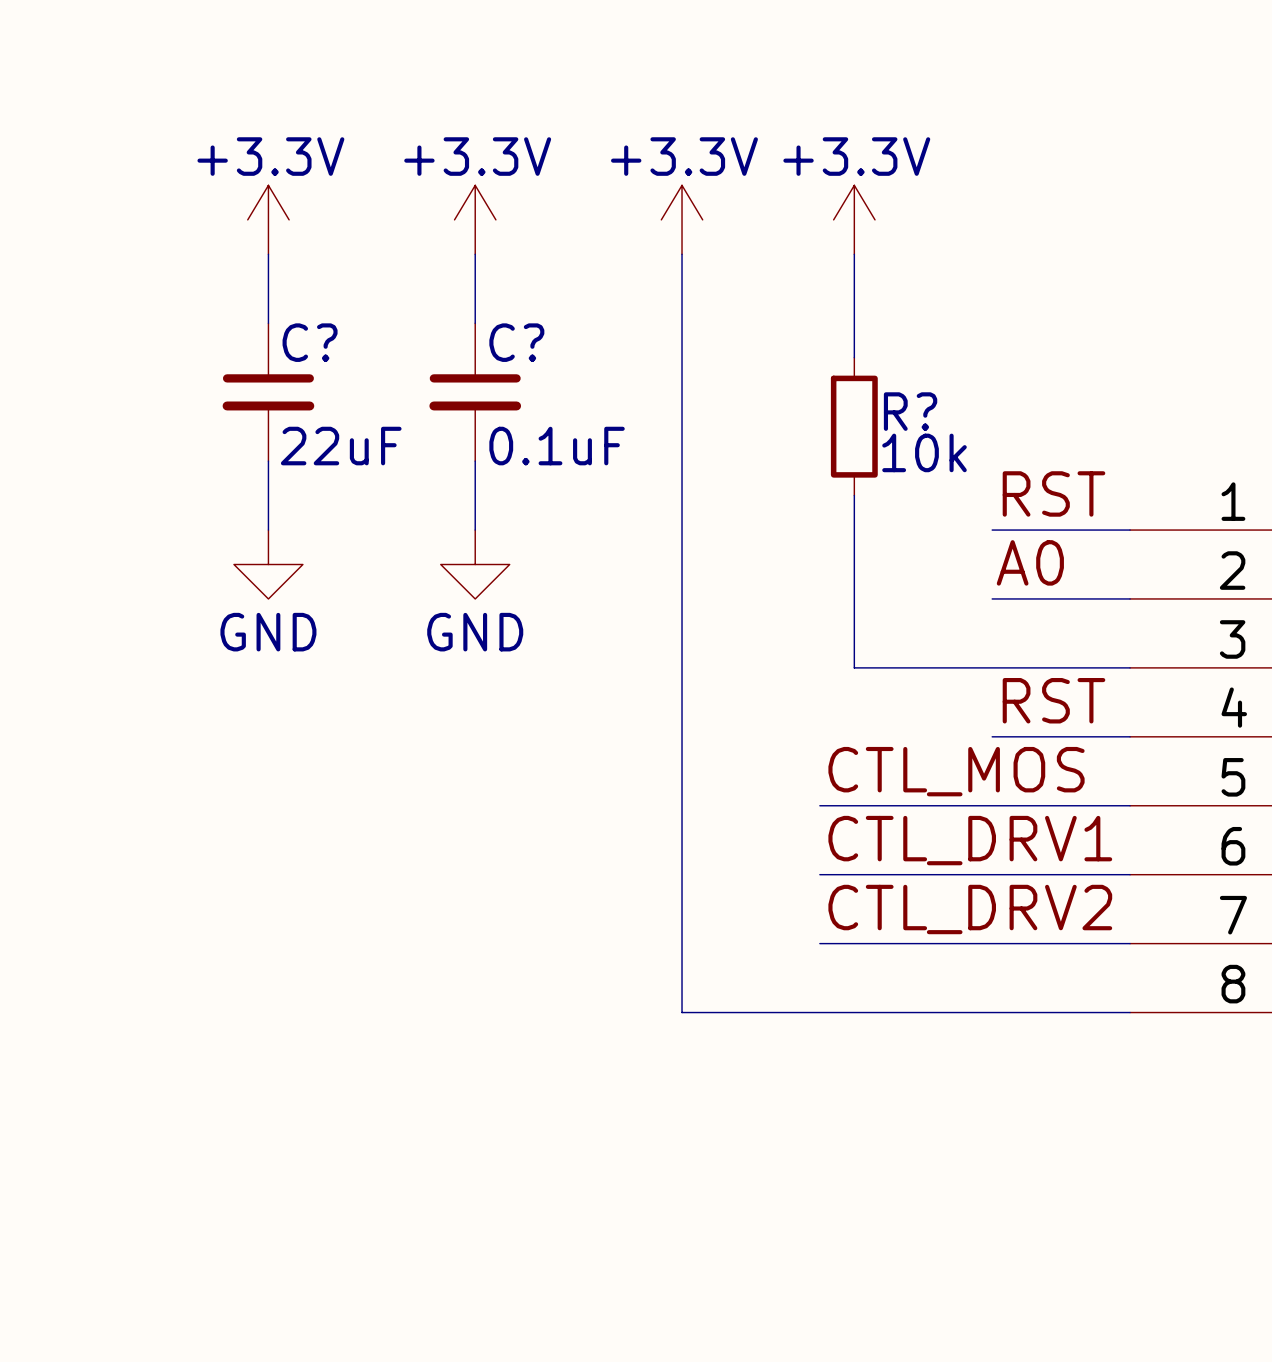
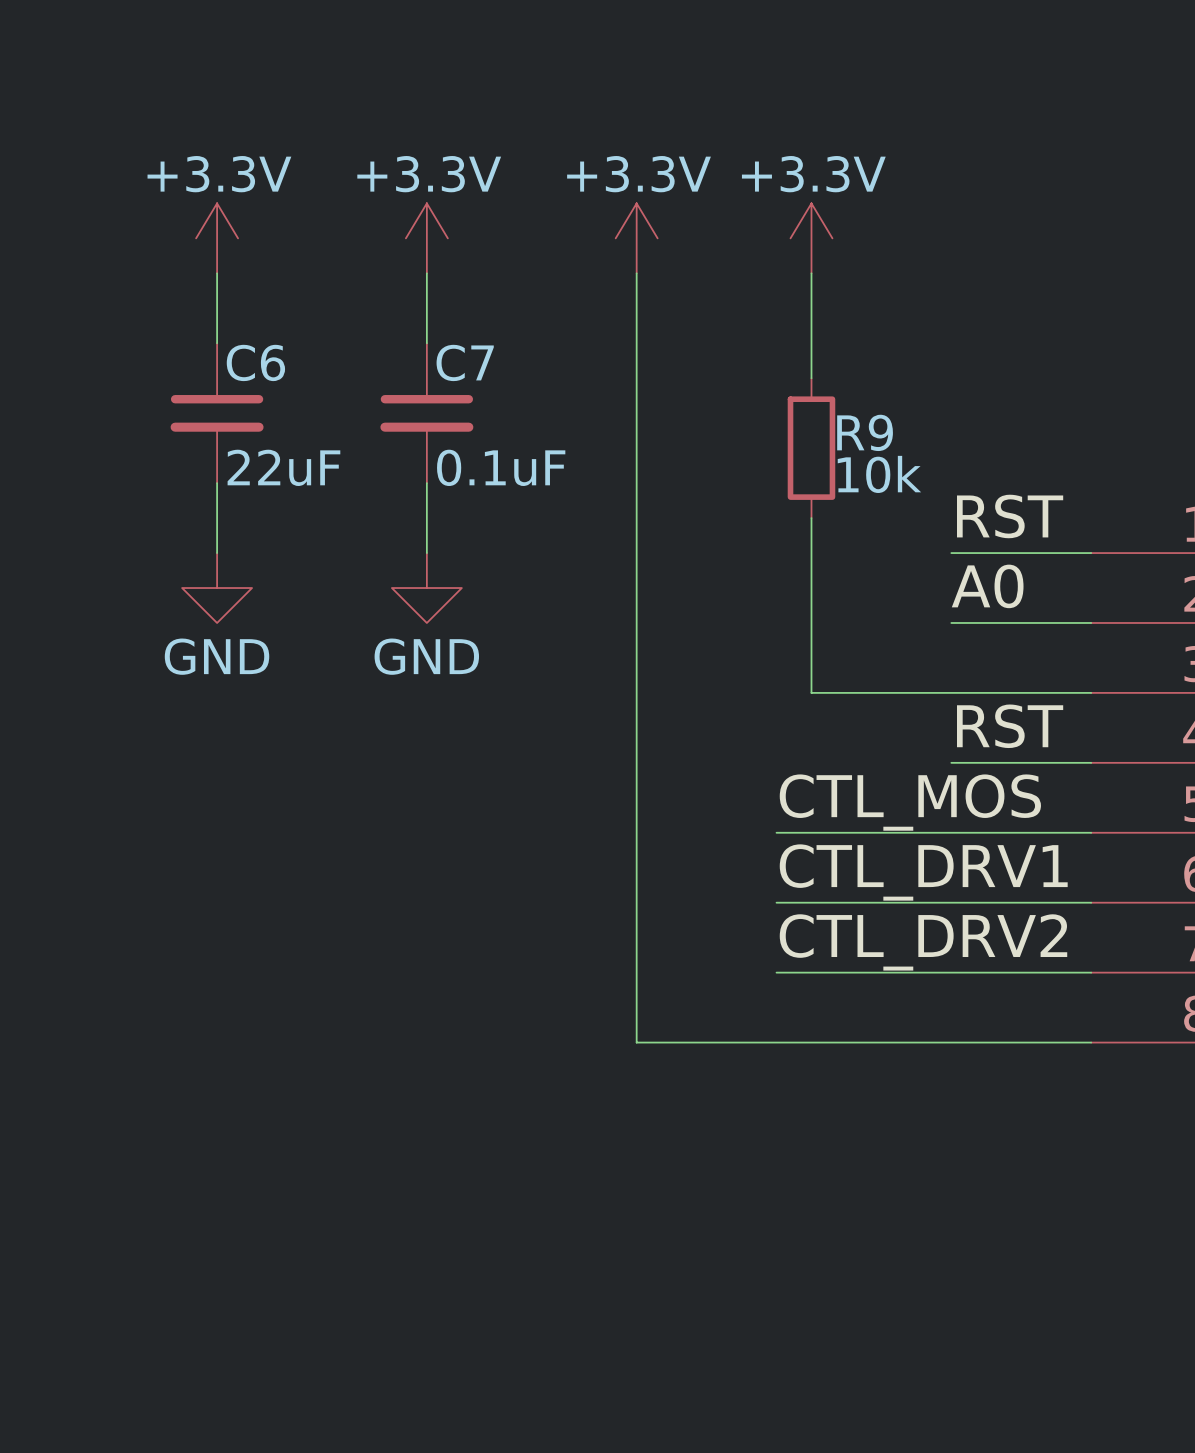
C? name: C? (310, 342) -> C6 (255, 362)
C? name: C? (516, 342) -> C7 (465, 362)
R? name: R? (910, 411) -> R9 (865, 432)

